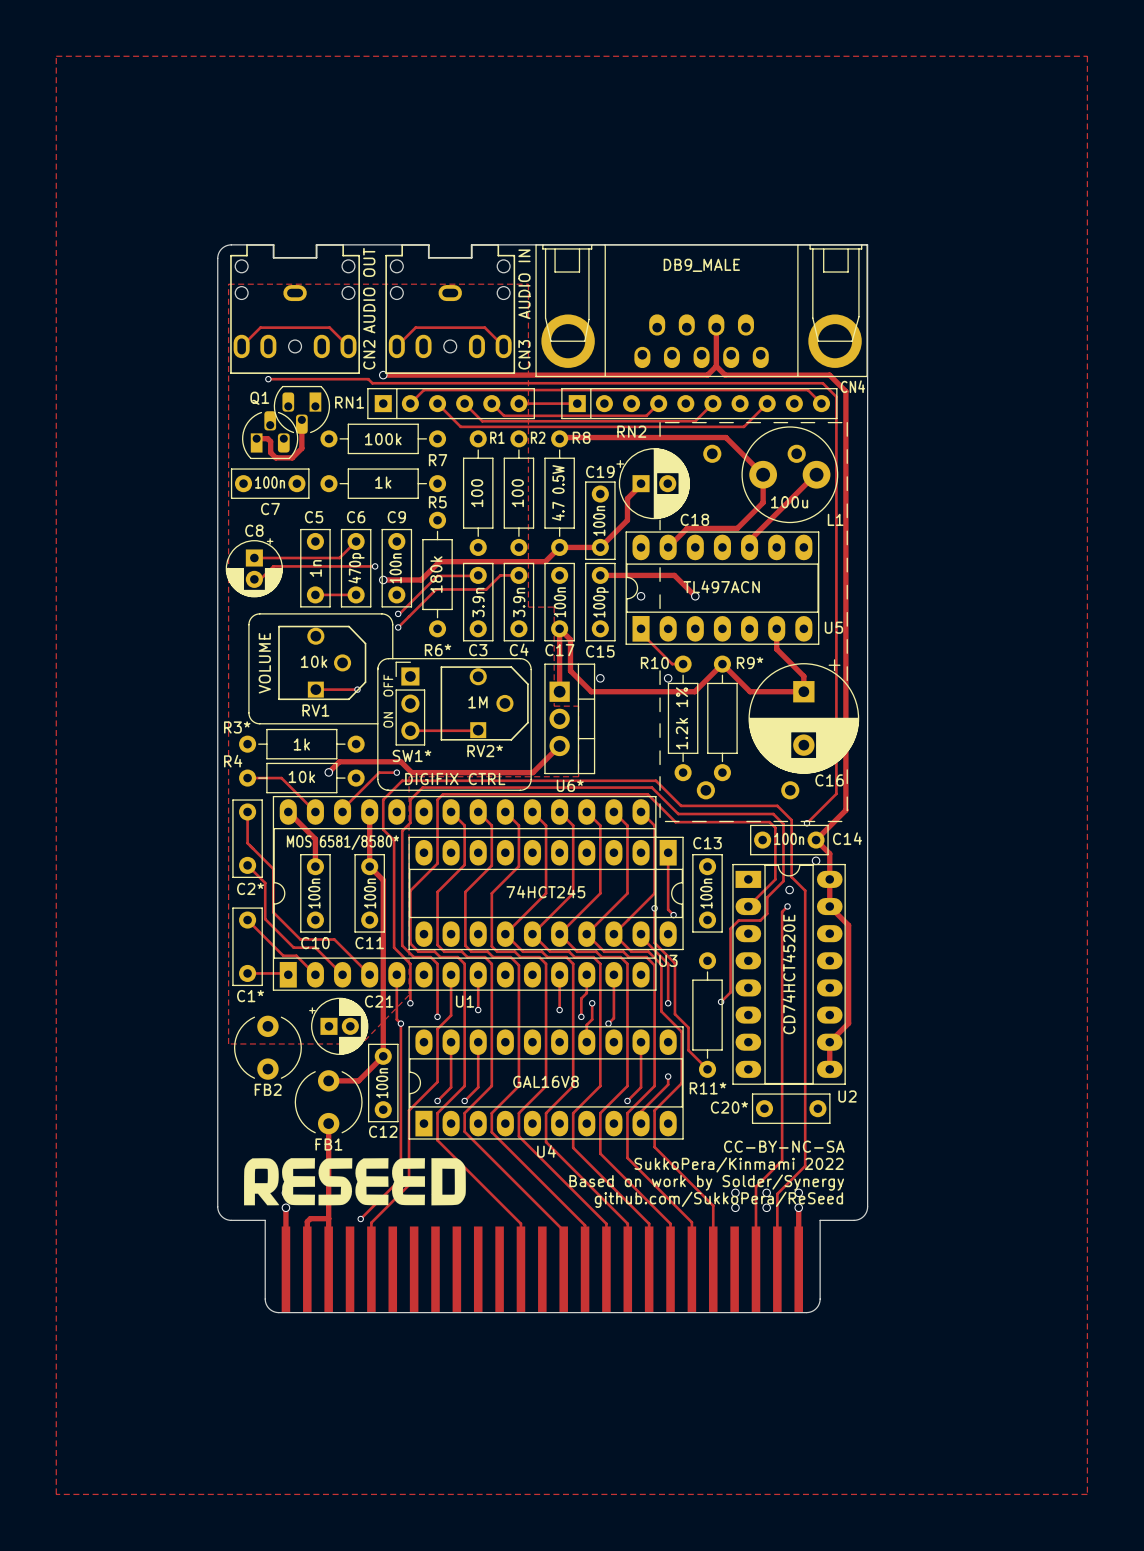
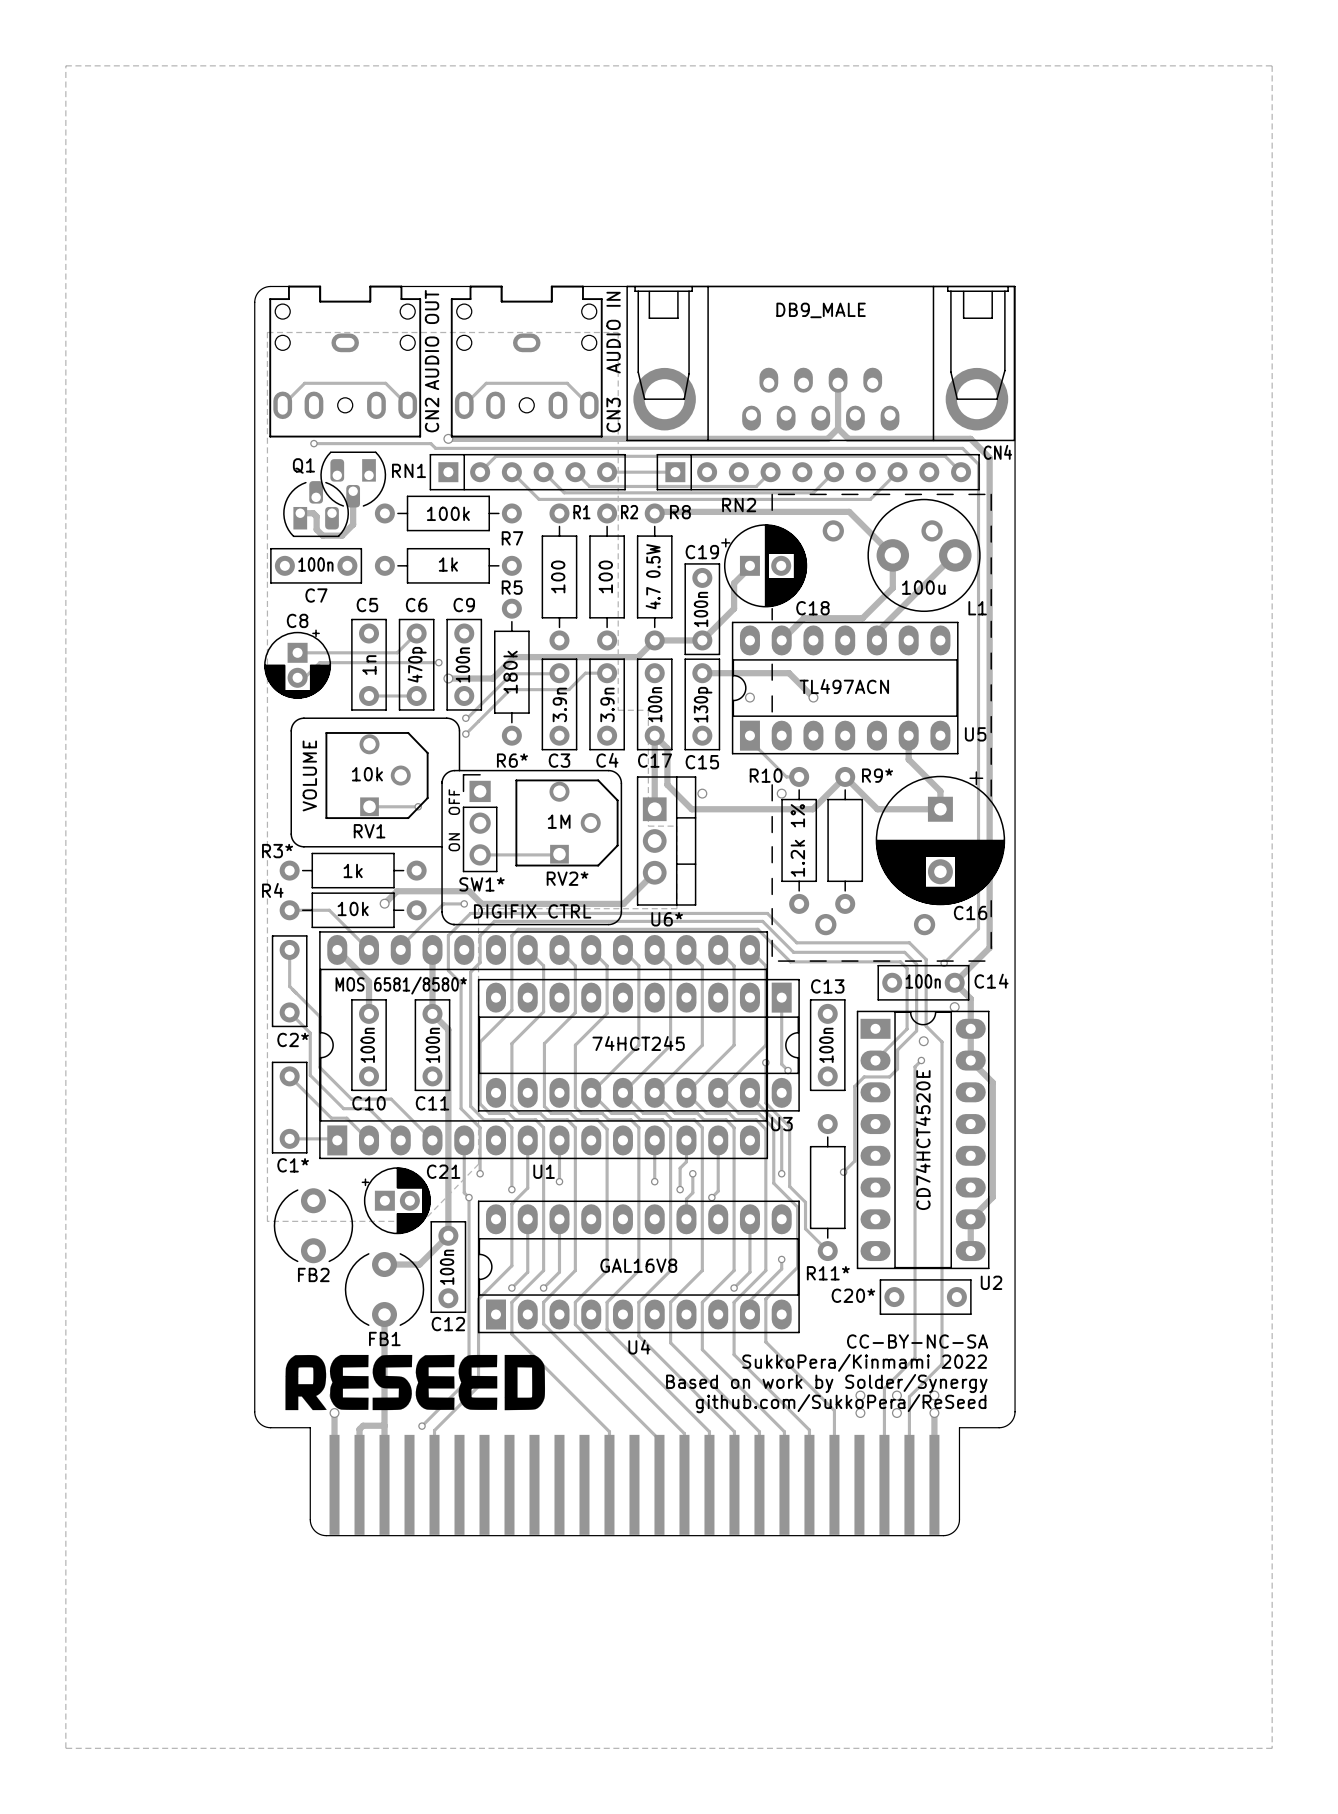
C15 value: 100p (601, 602) -> 130p (703, 704)

